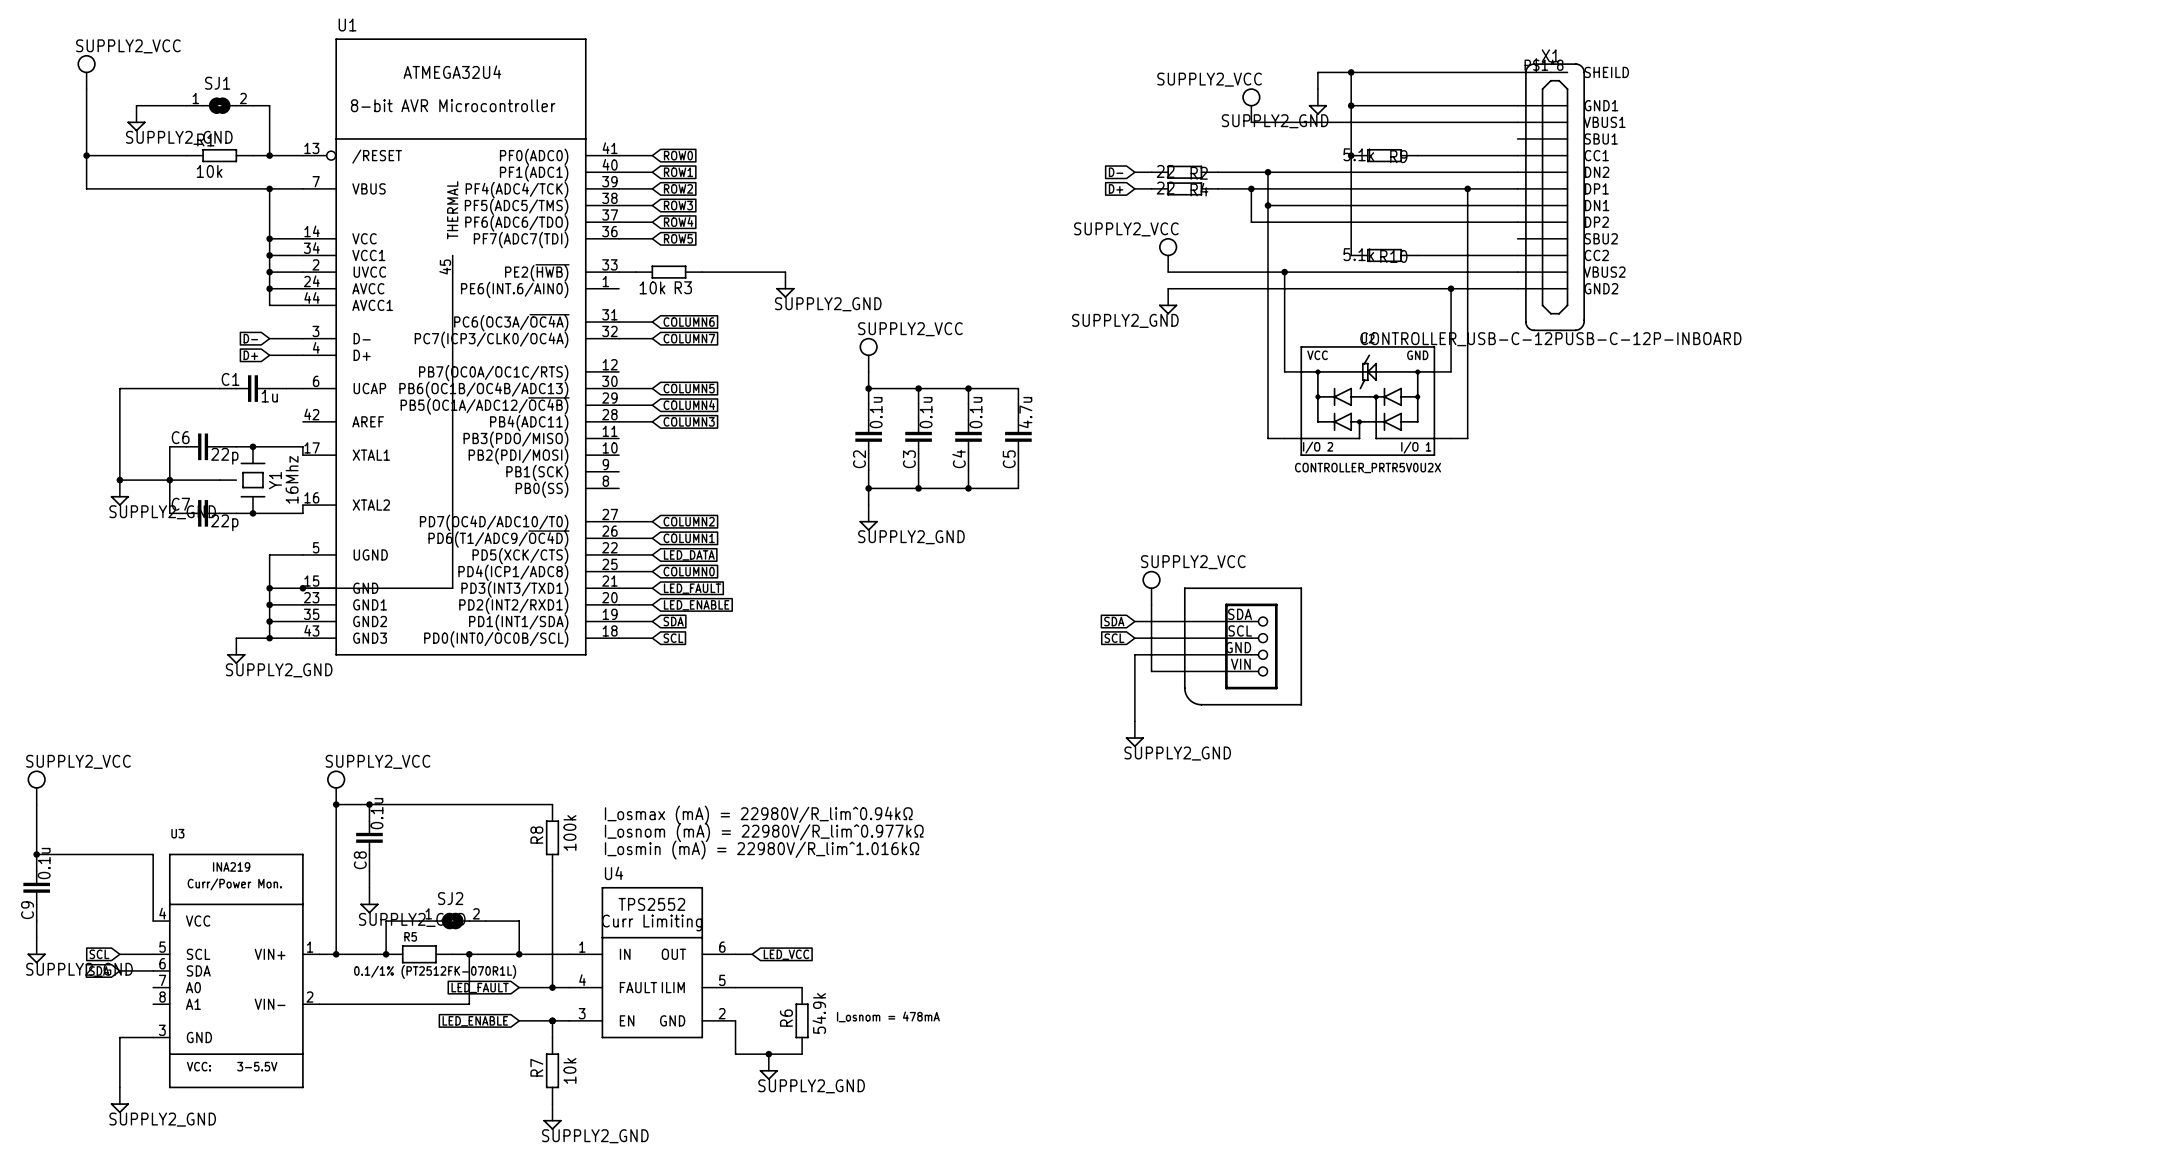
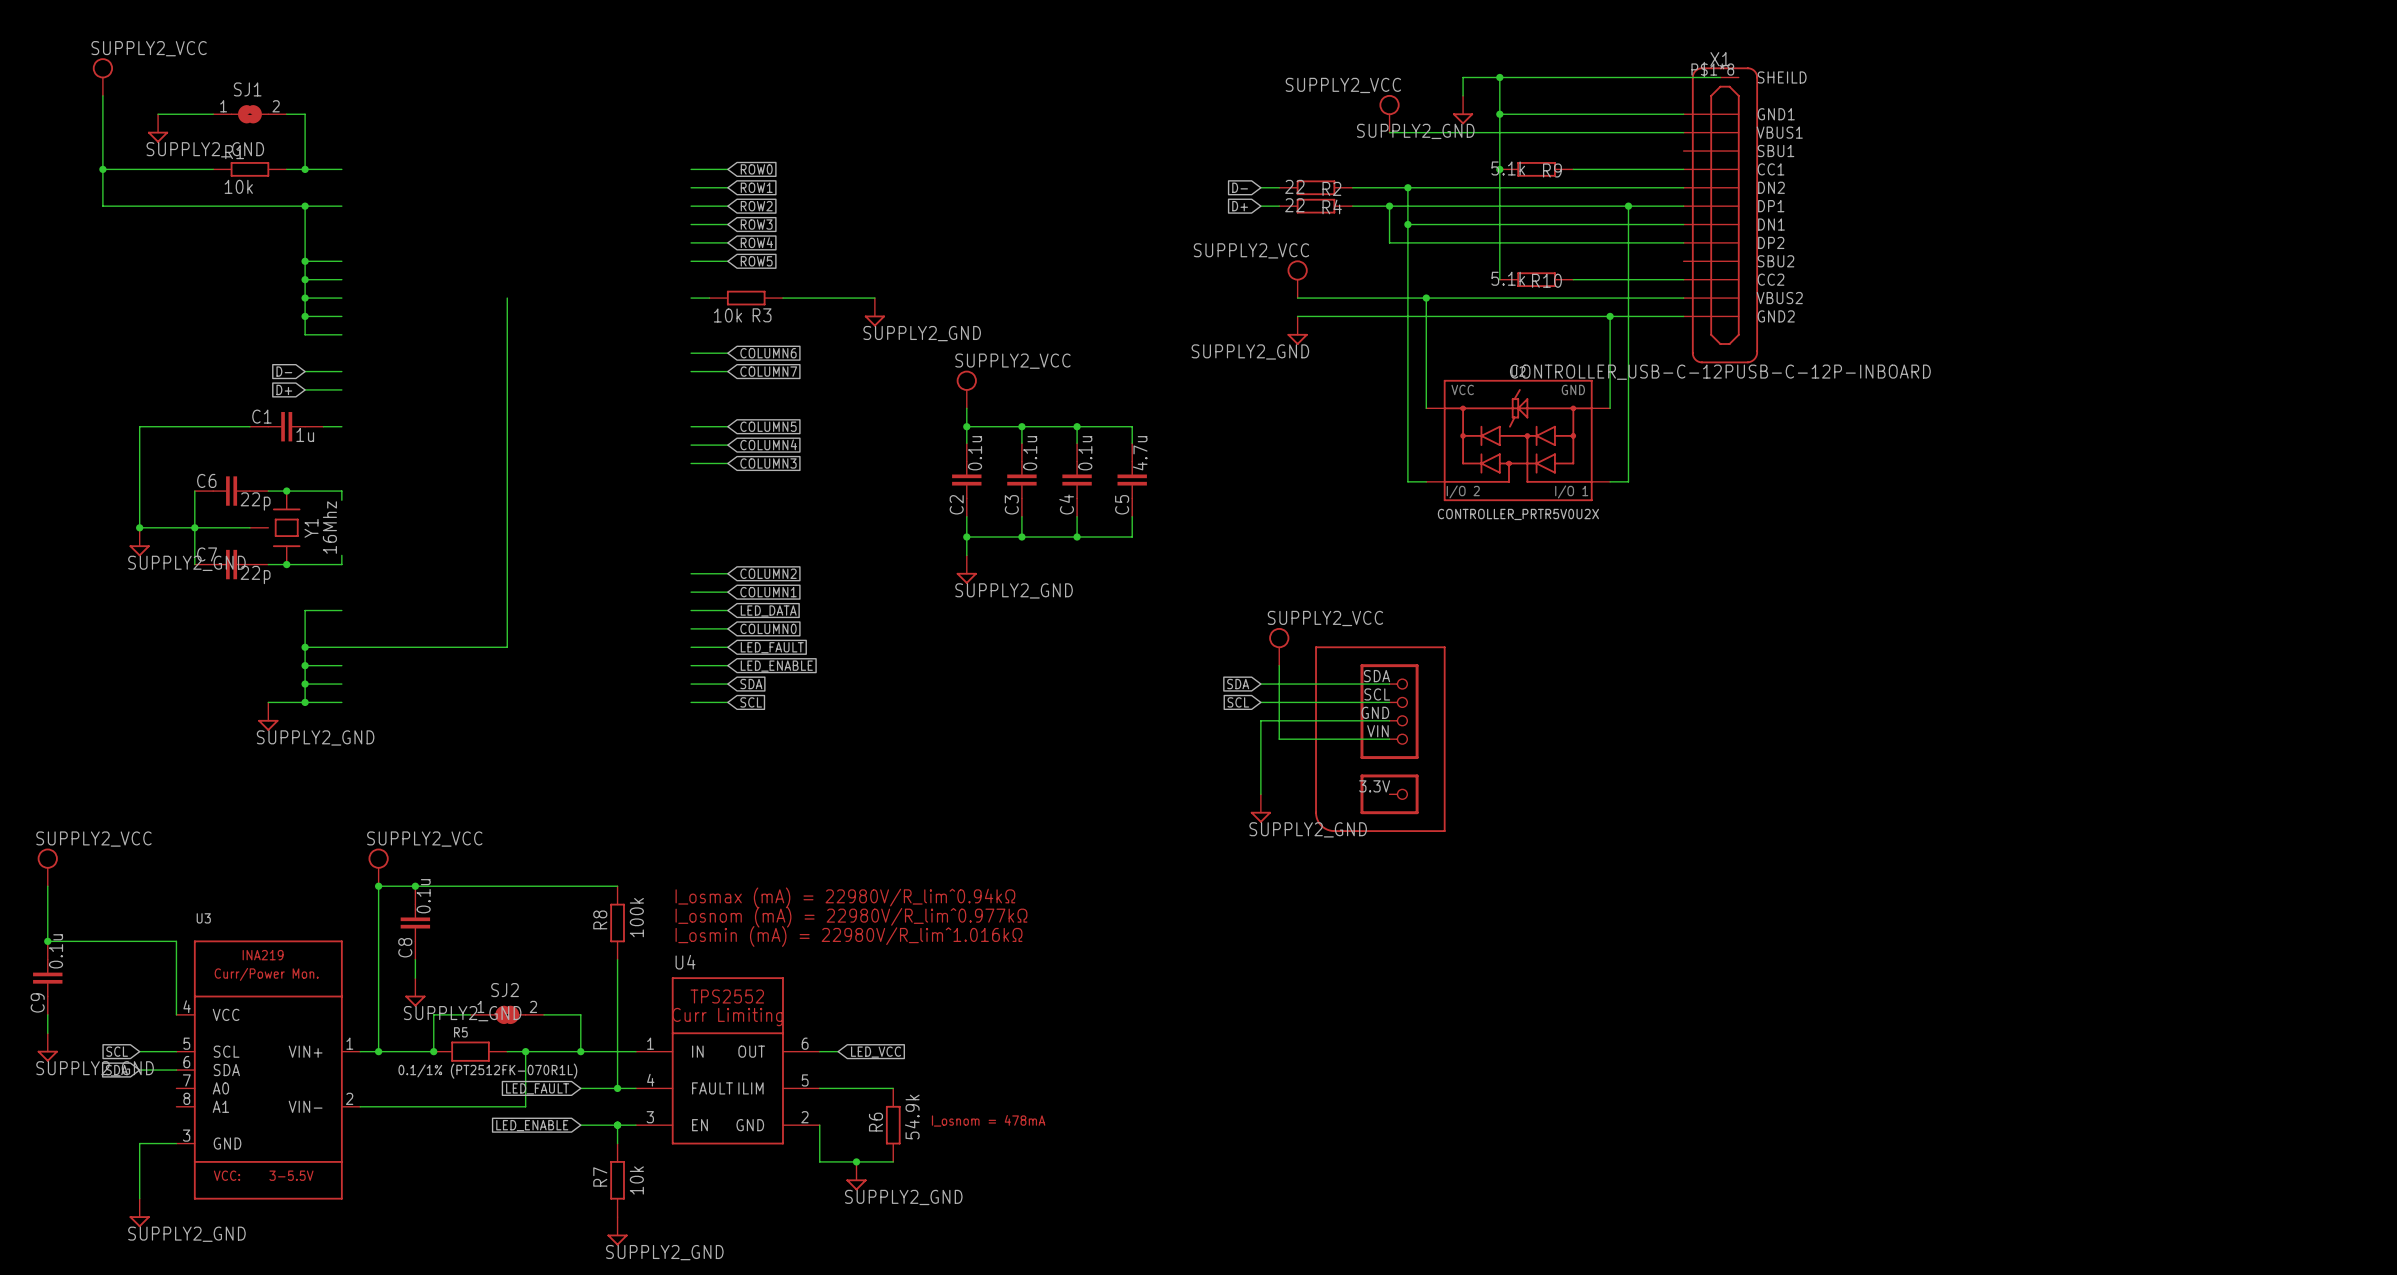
U1: (460, 346) -> none
junction: (302, 588) -> none
part: (1243, 646) -> none
part: none -> (1380, 739)

